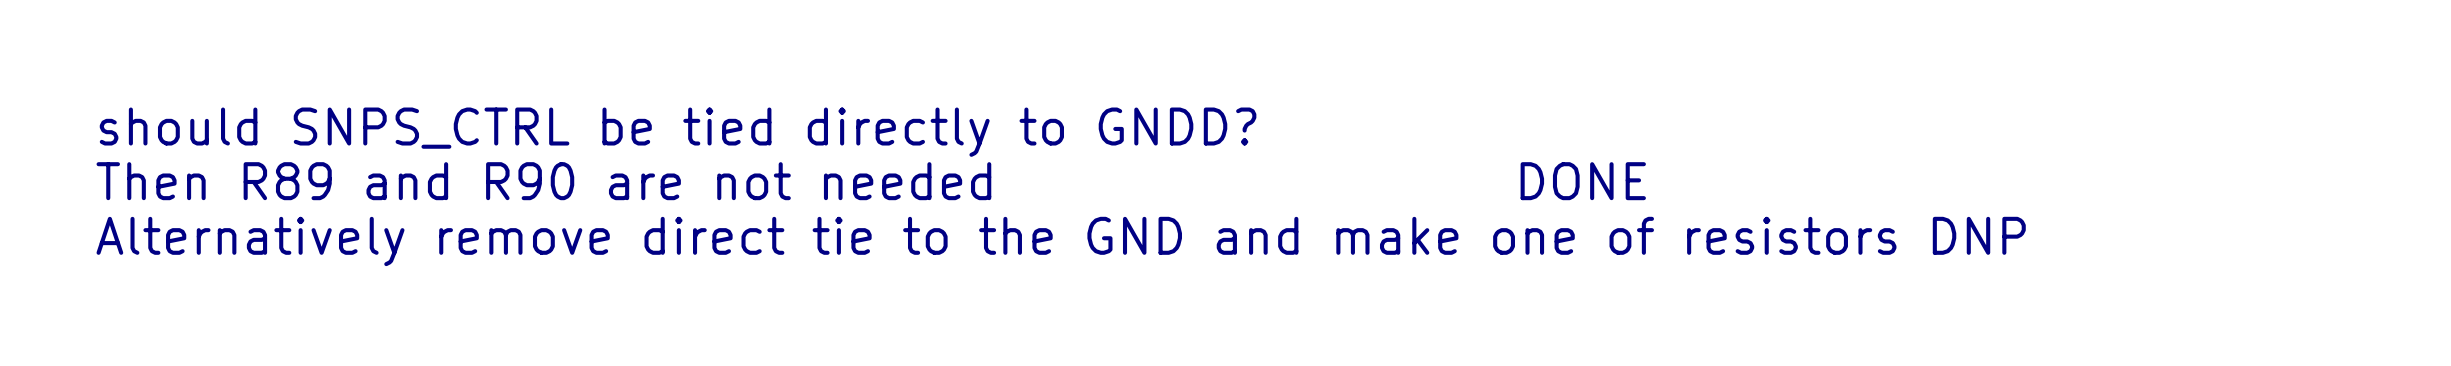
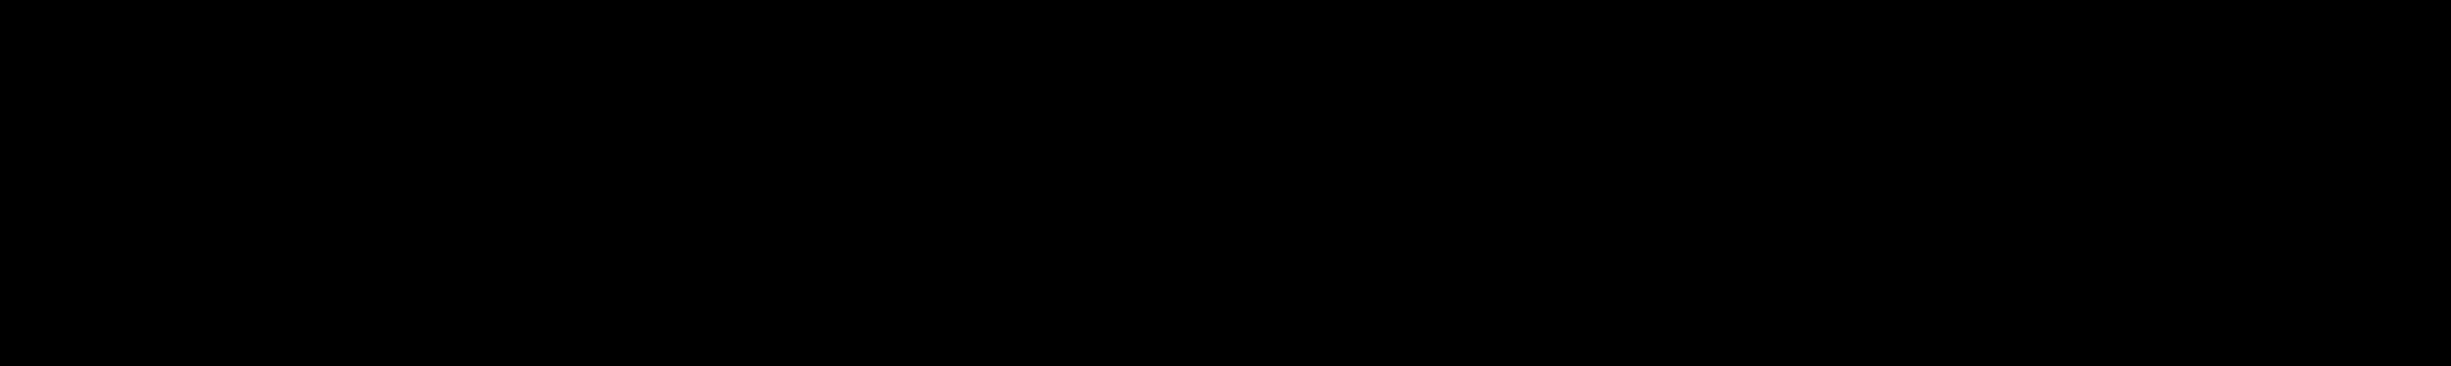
text: should SNPS_CTRL be tied directly to GNDD? (678, 132) -> none
text: Then R89 and R90 are not needed DONE (871, 181) -> none
text: Alternatively remove direct tie to the GND and make one of resistors DNP (1061, 241) -> none

